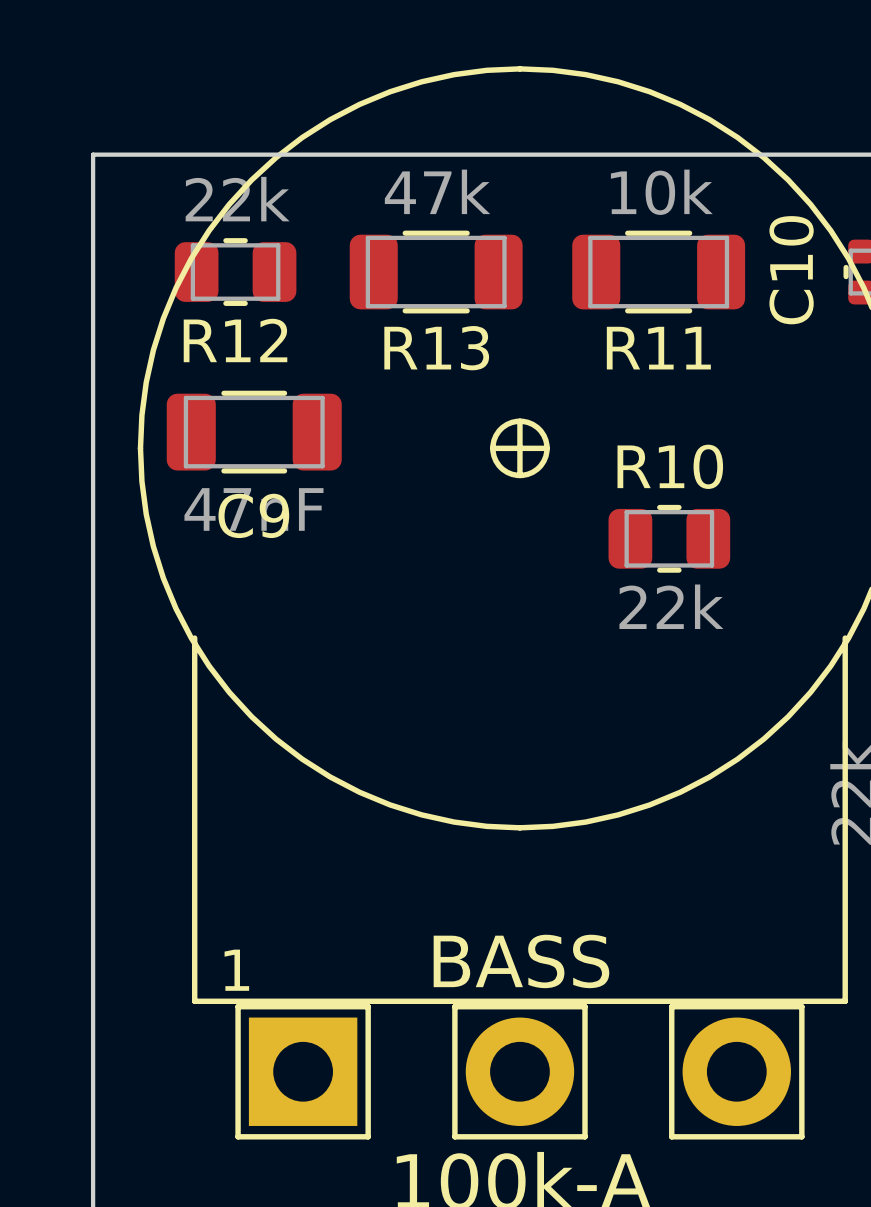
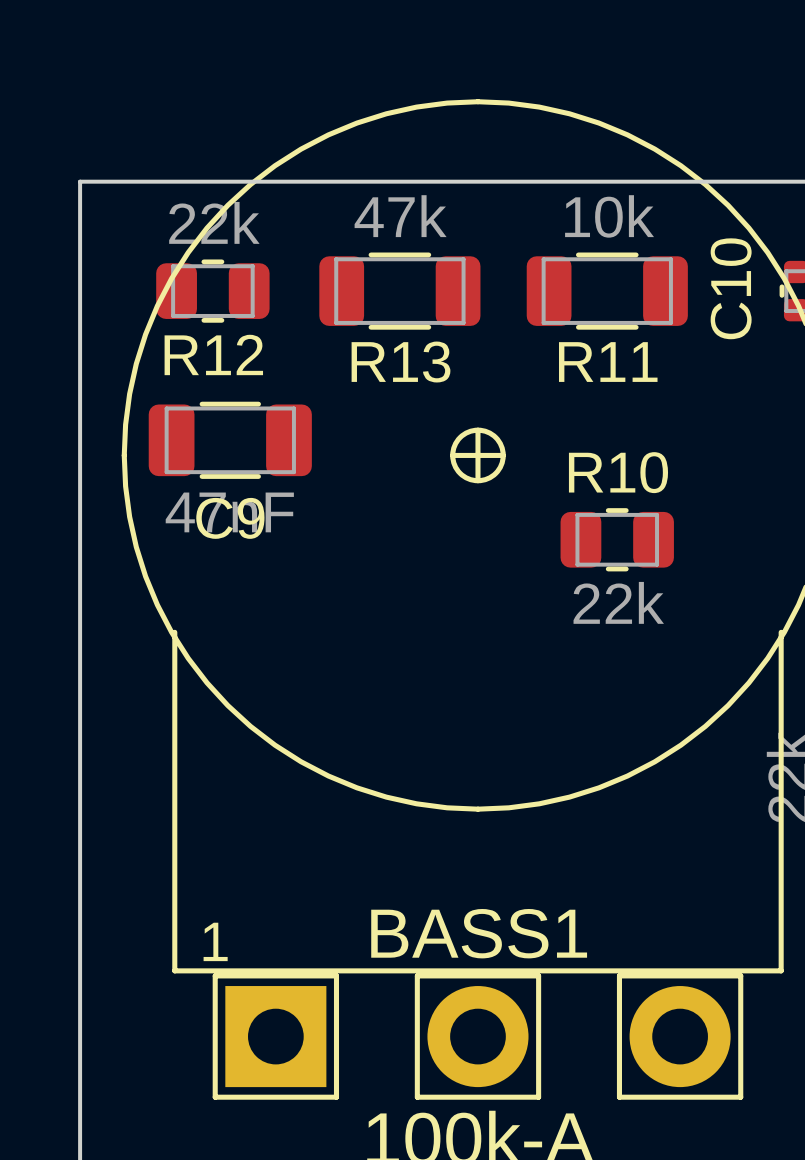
BASS name: BASS (521, 961) -> BASS1 (479, 933)

